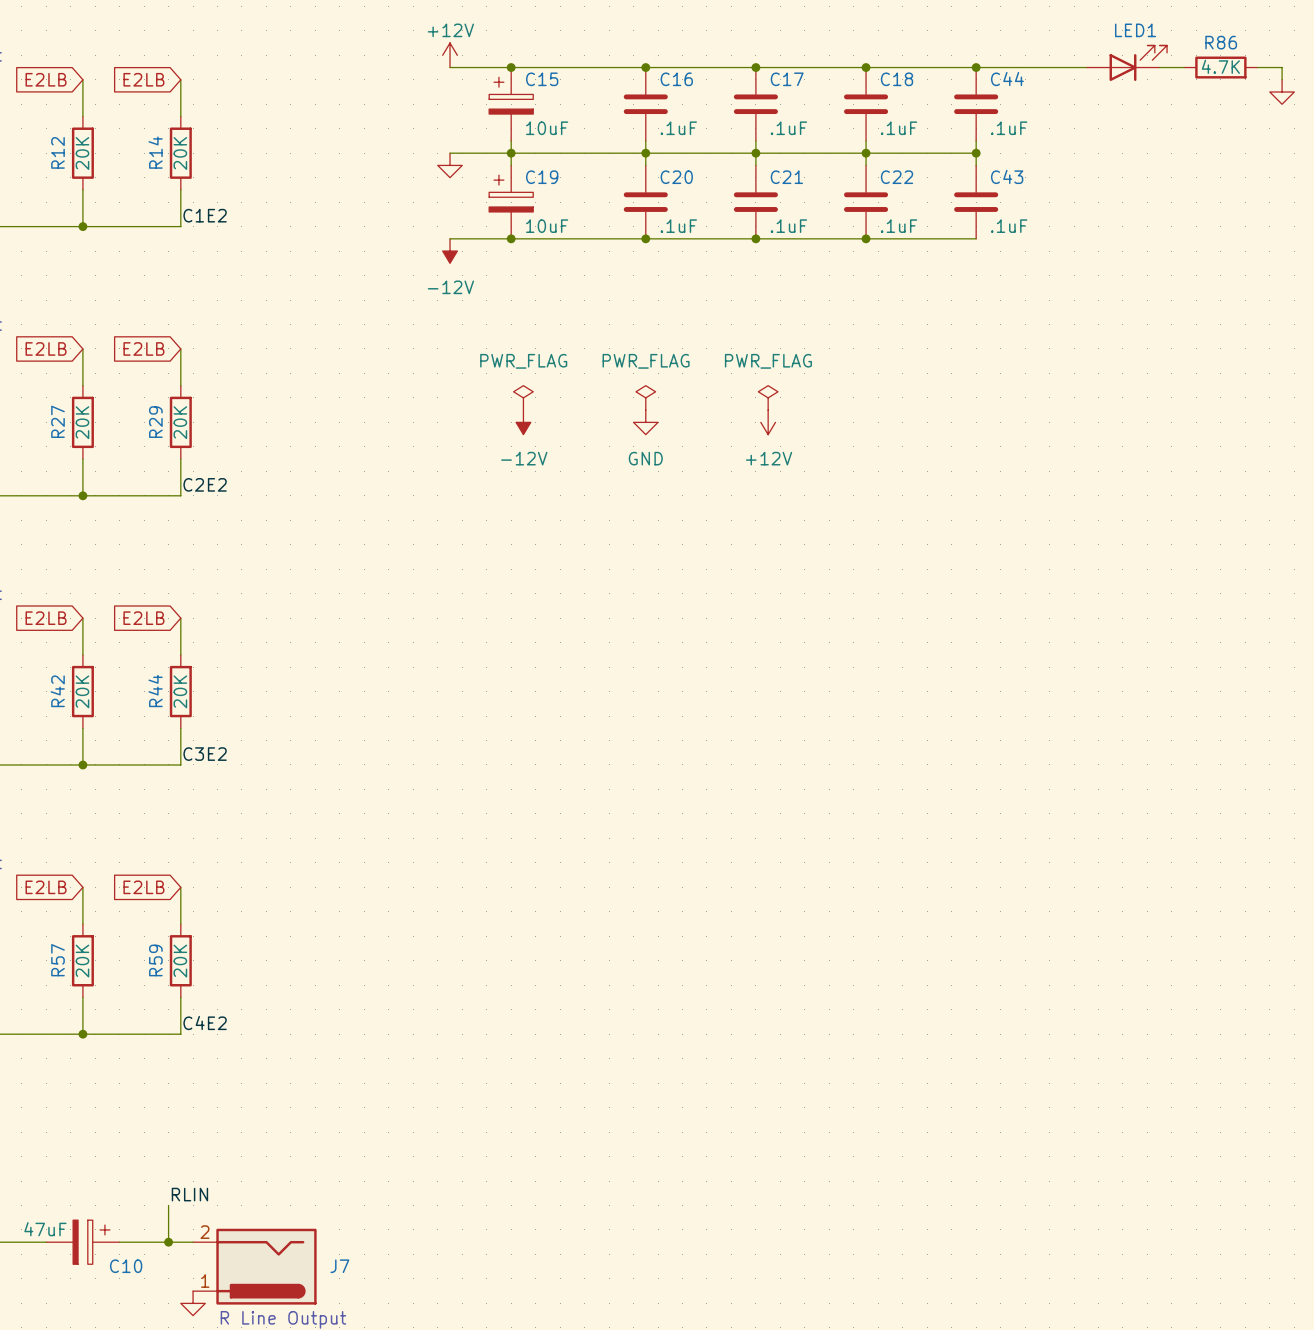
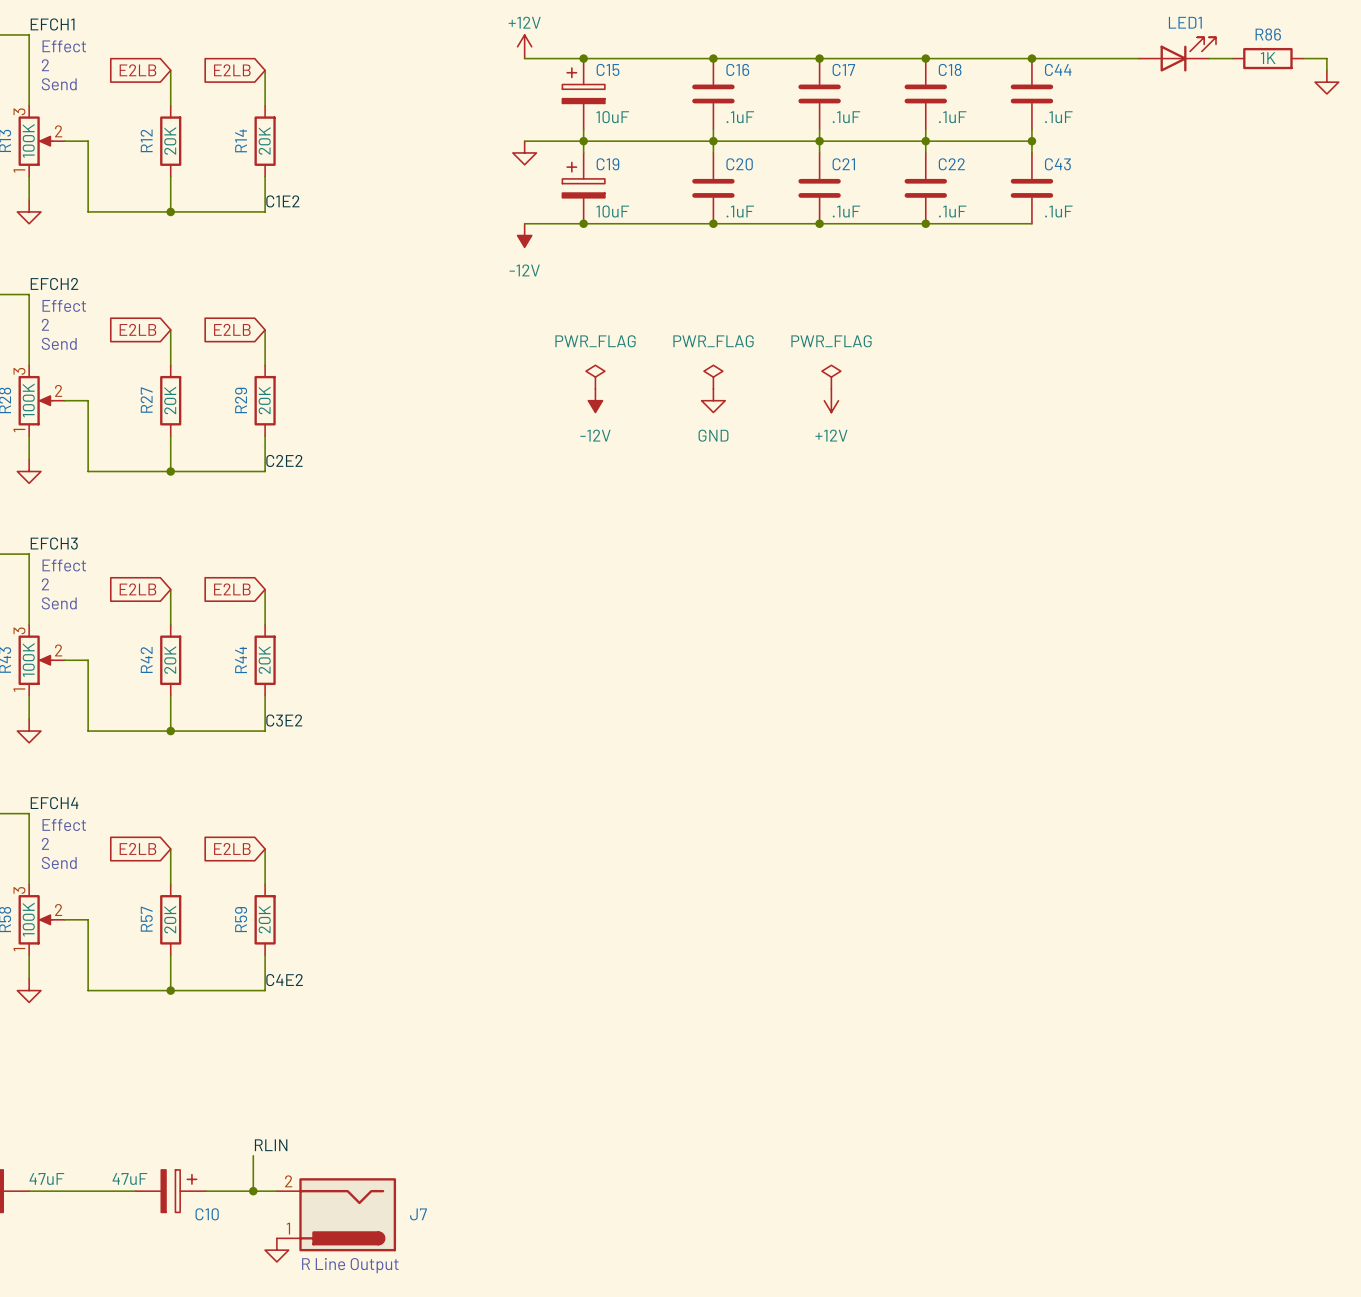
R86 value: 4.7K (1220, 66) -> 1K (1268, 58)

